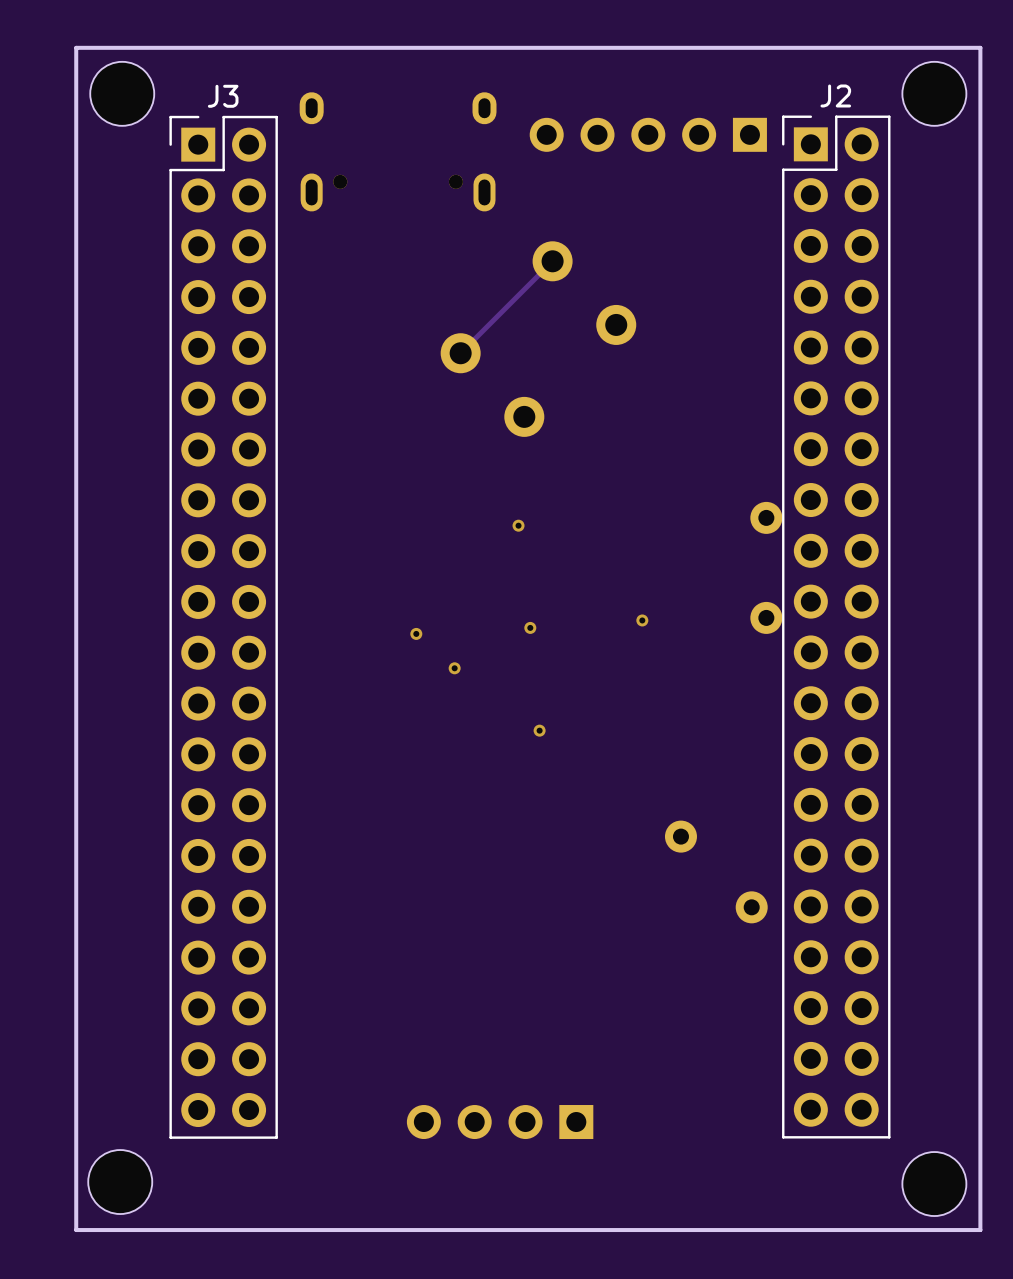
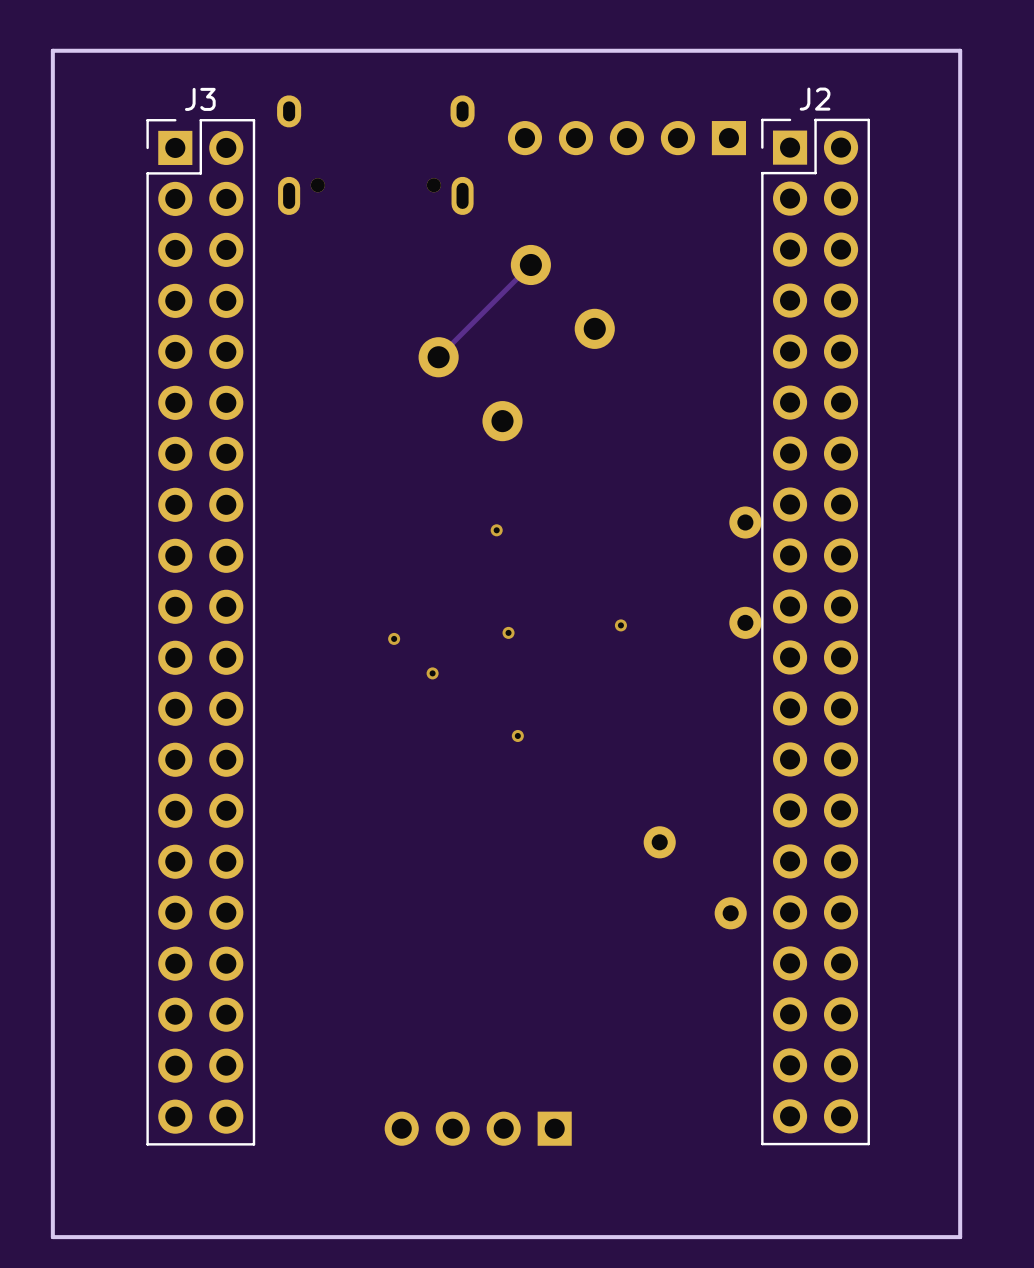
part: (122, 93) -> none
part: (934, 93) -> none
part: (120, 1182) -> none
part: (934, 1184) -> none

